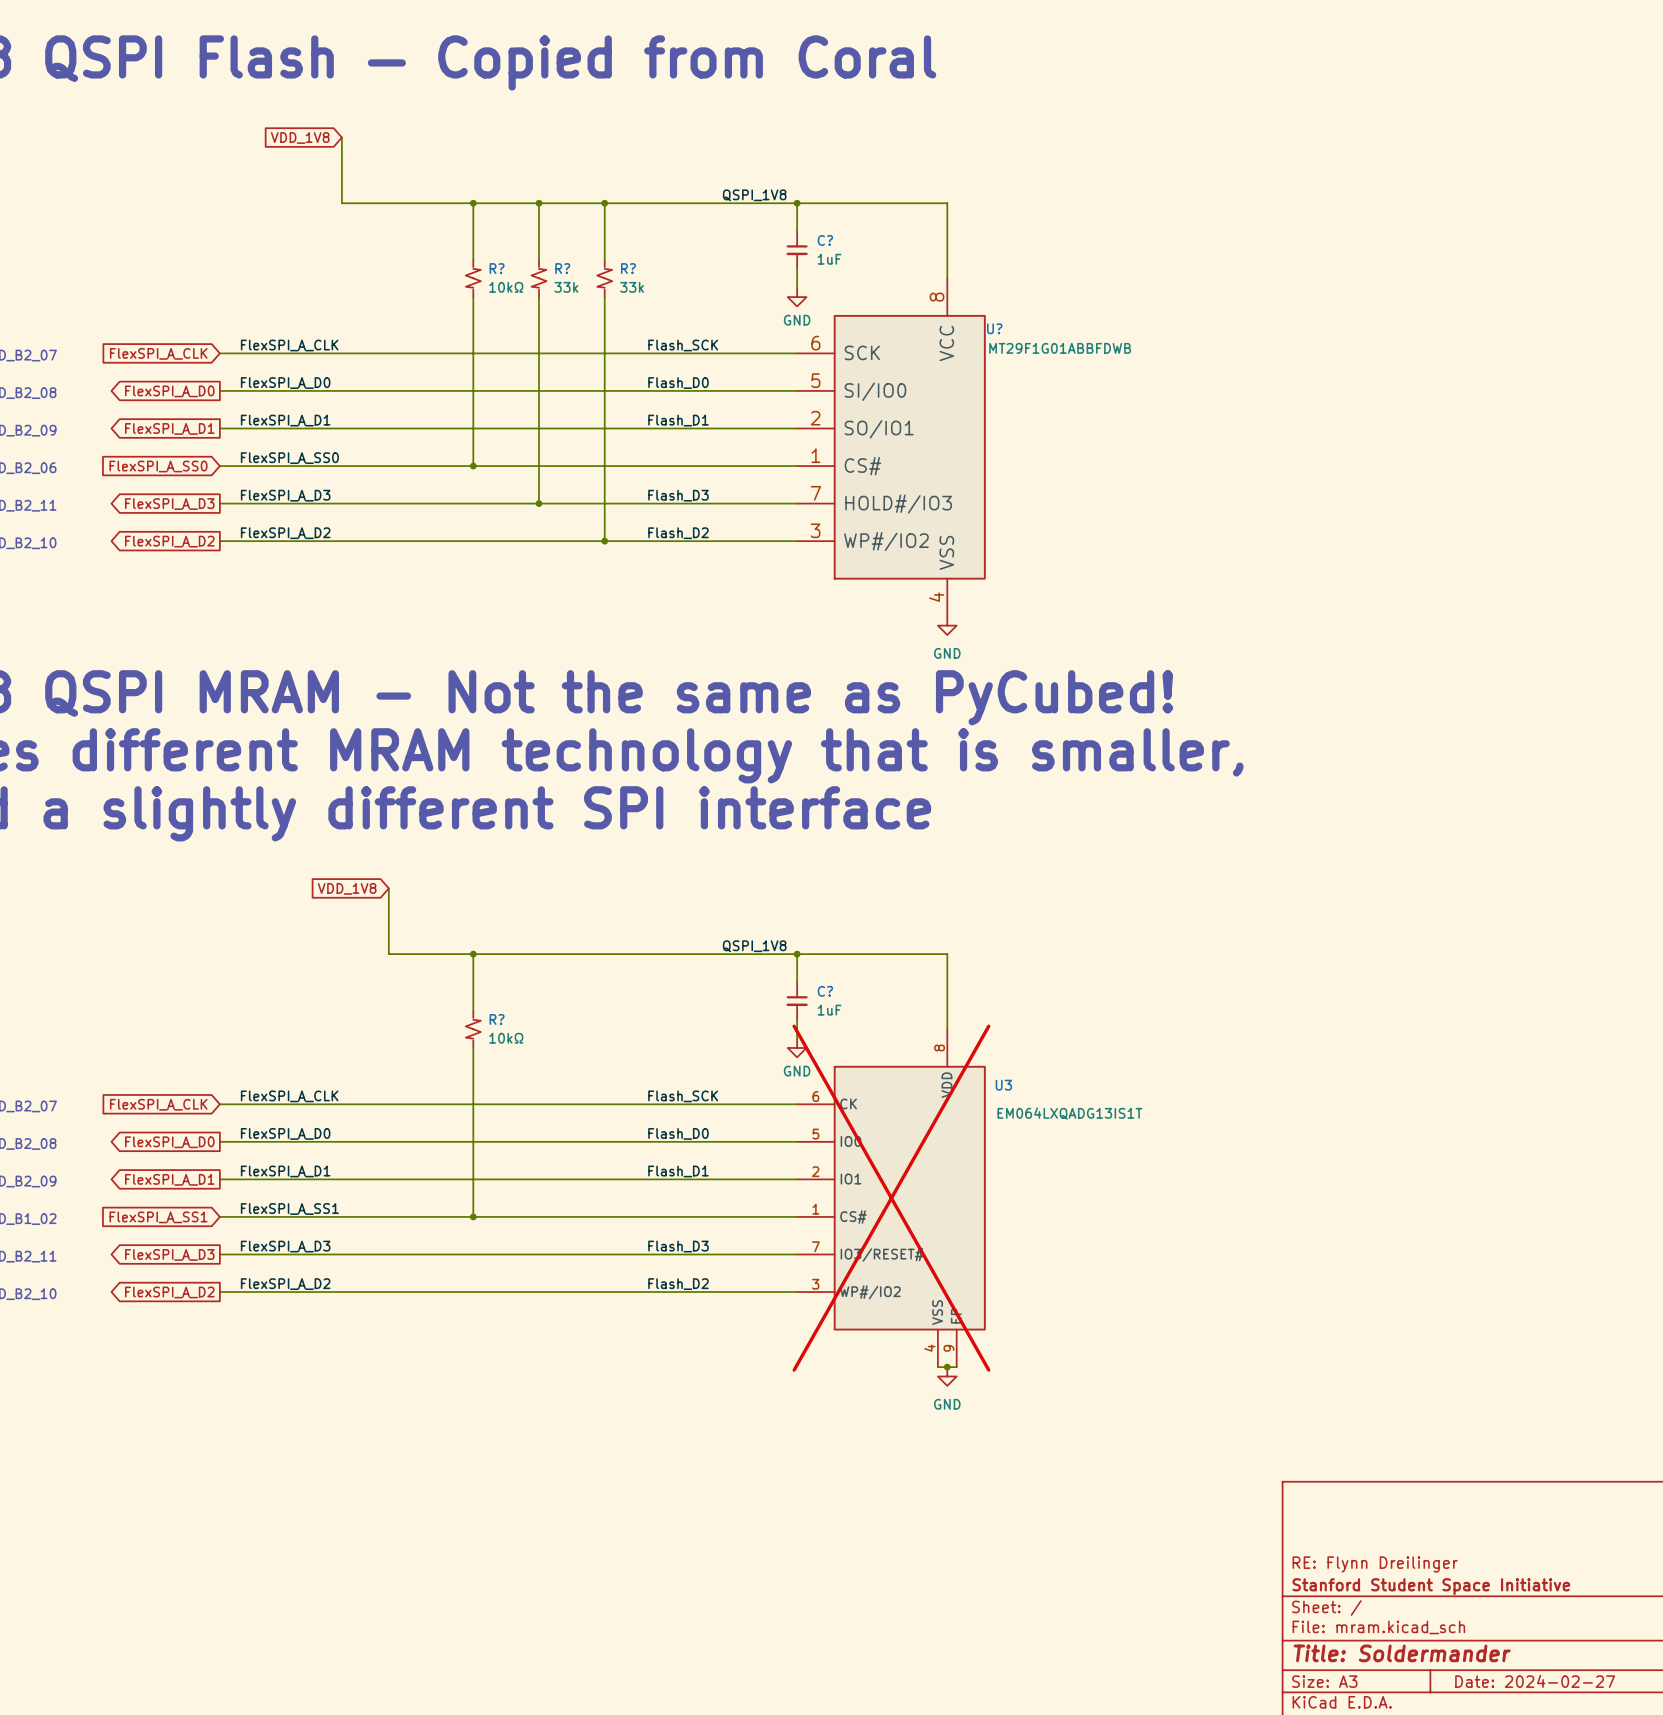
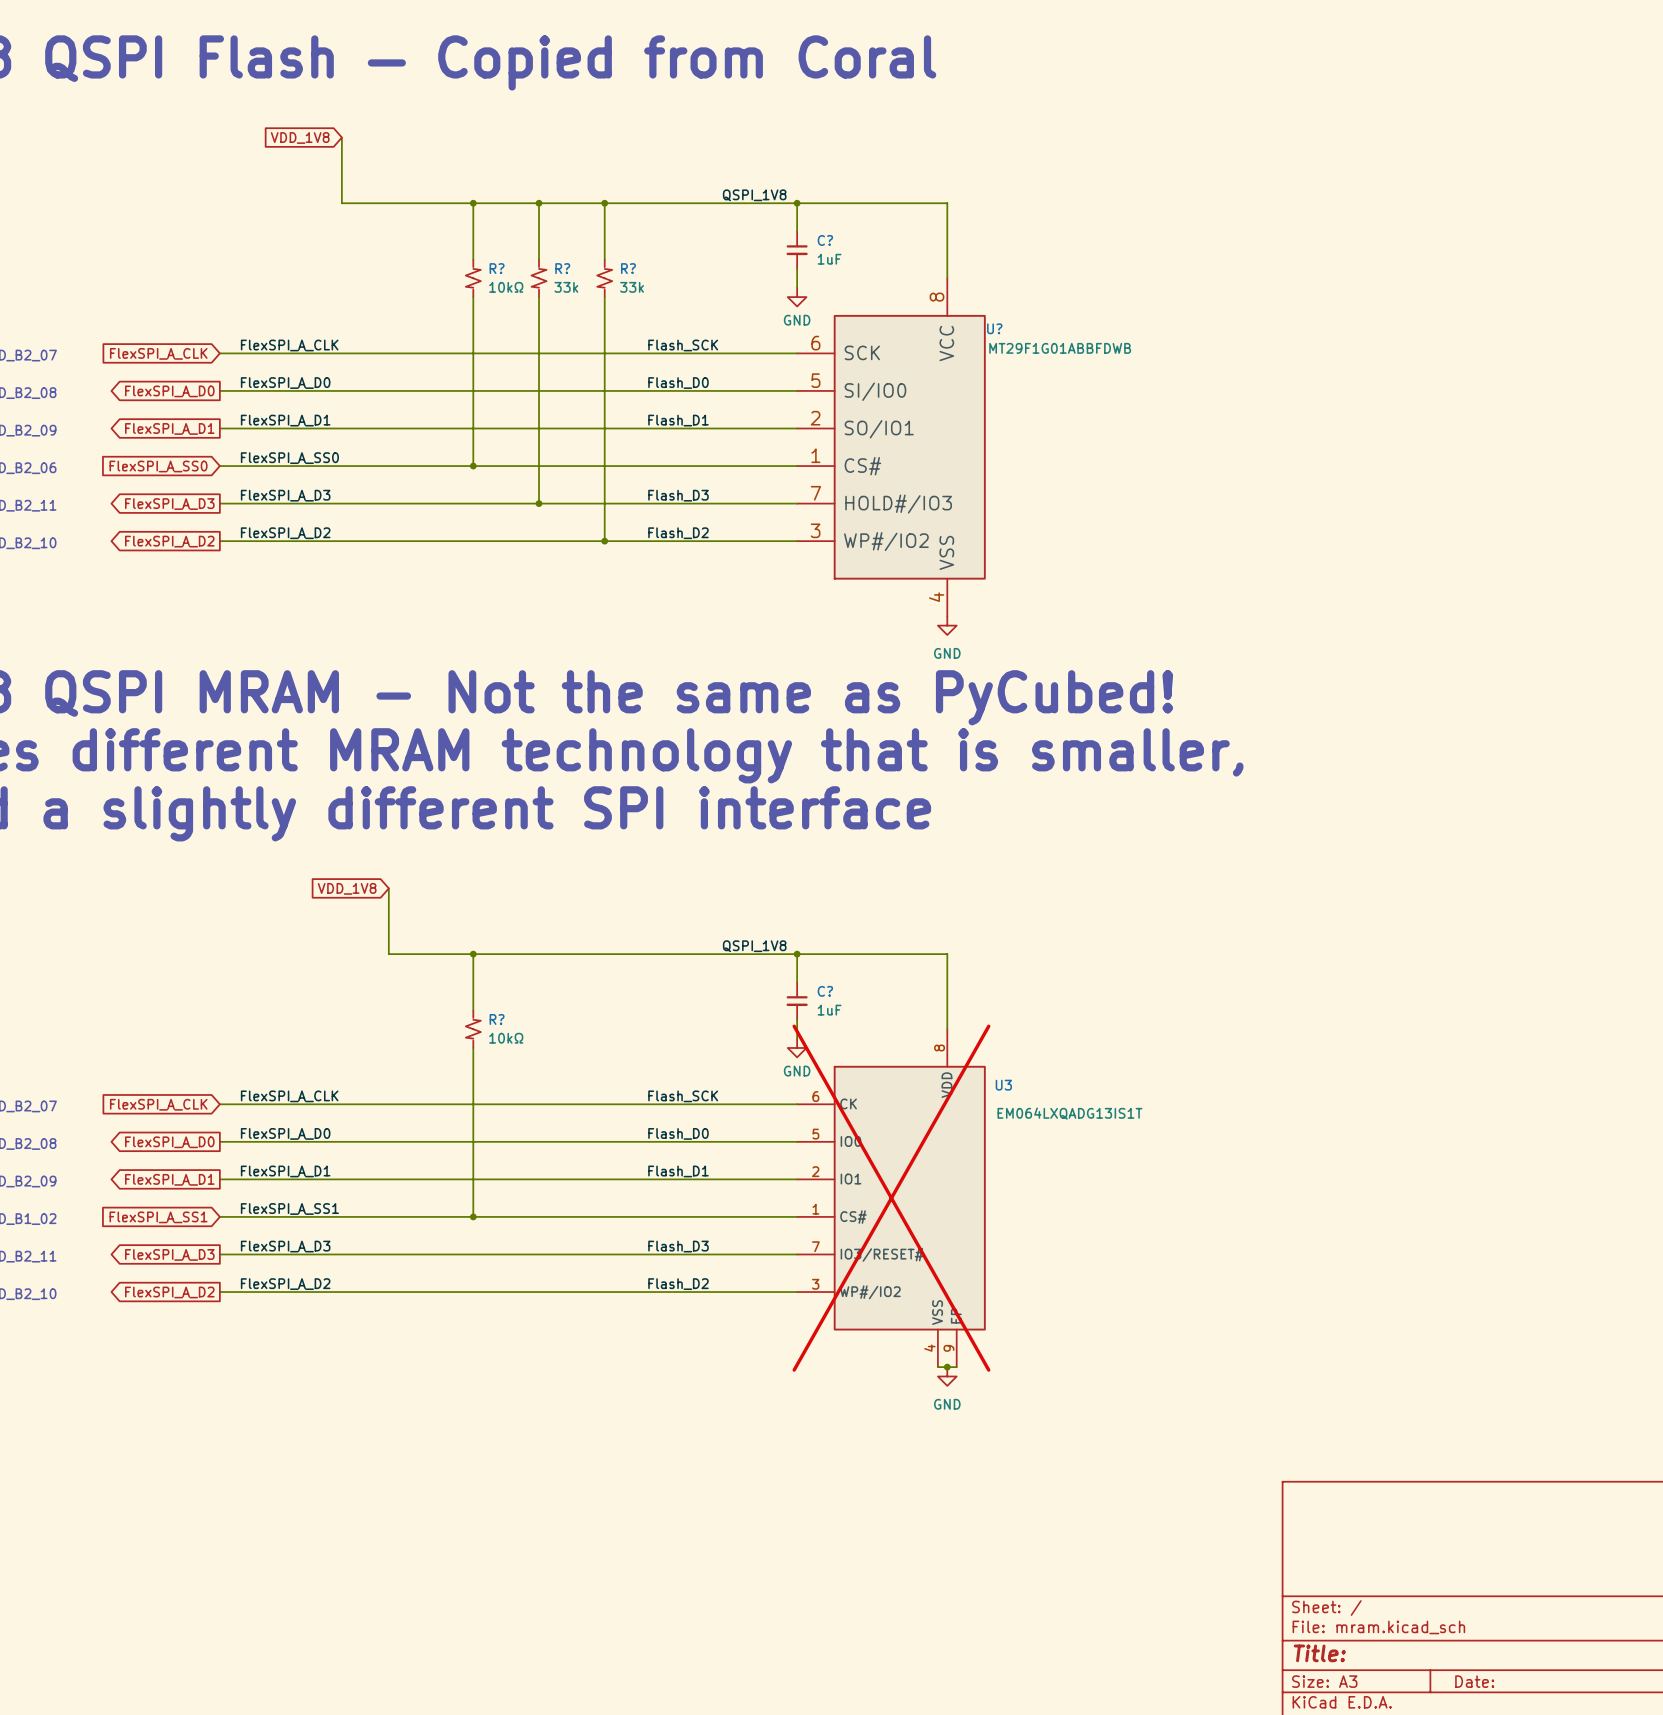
title block: RE: Flynn Dreilinger (1375, 1564) -> none
title block: Stanford Student Space Initiative (1431, 1586) -> none
title block: Title: Soldermander (1402, 1653) -> Title: (1319, 1653)
title block: Date: 2024-02-27 (1535, 1681) -> Date: (1474, 1681)

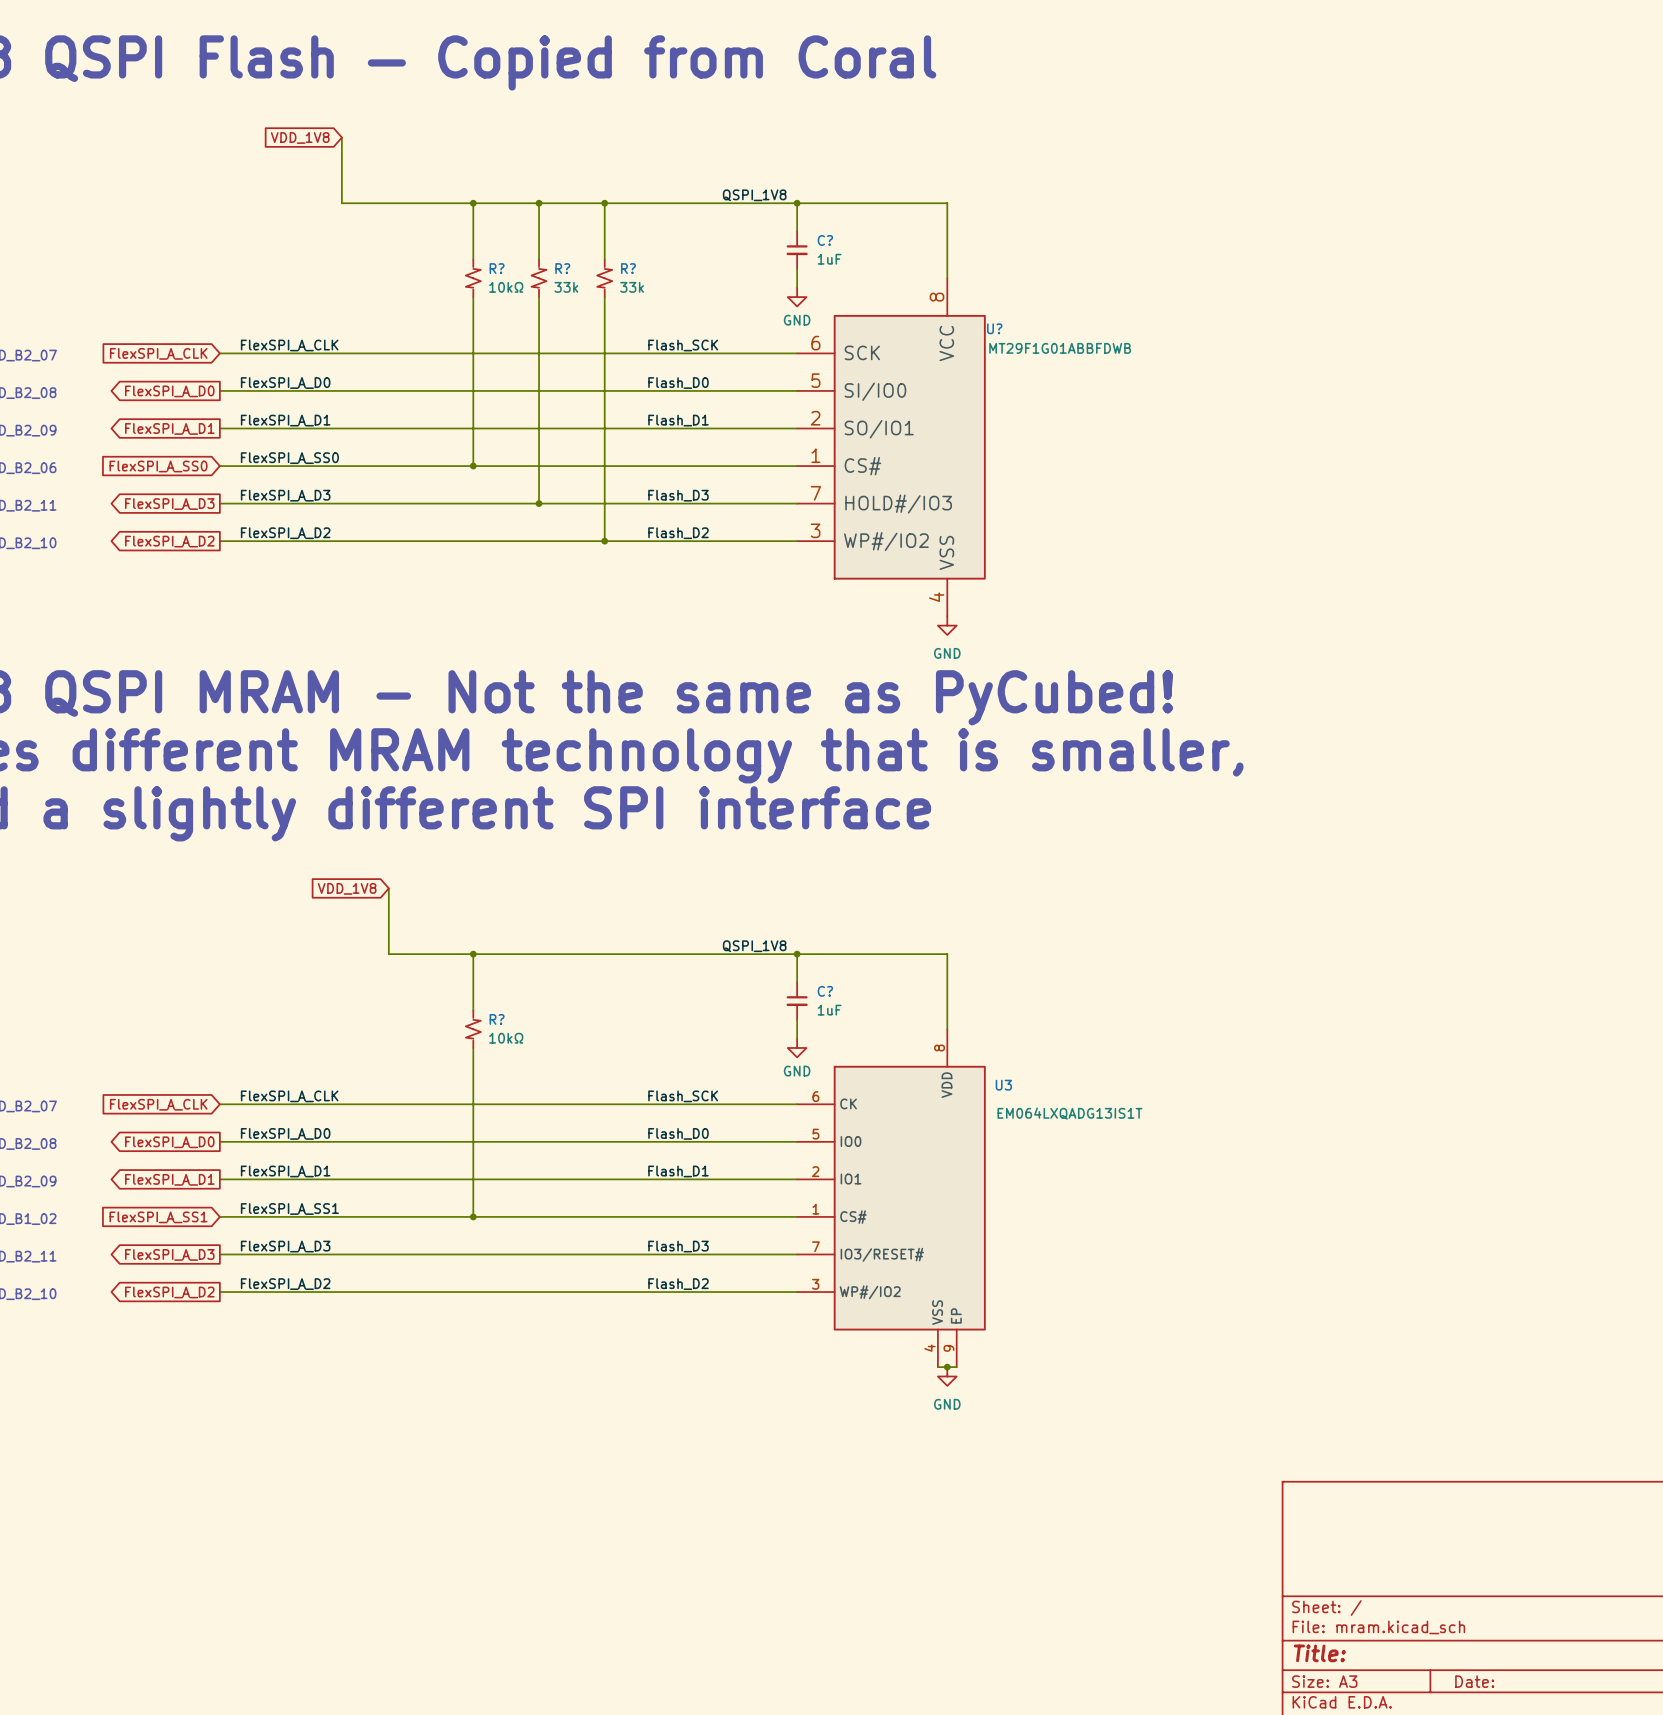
U3 do-not-place cross: (891, 1198) -> none

